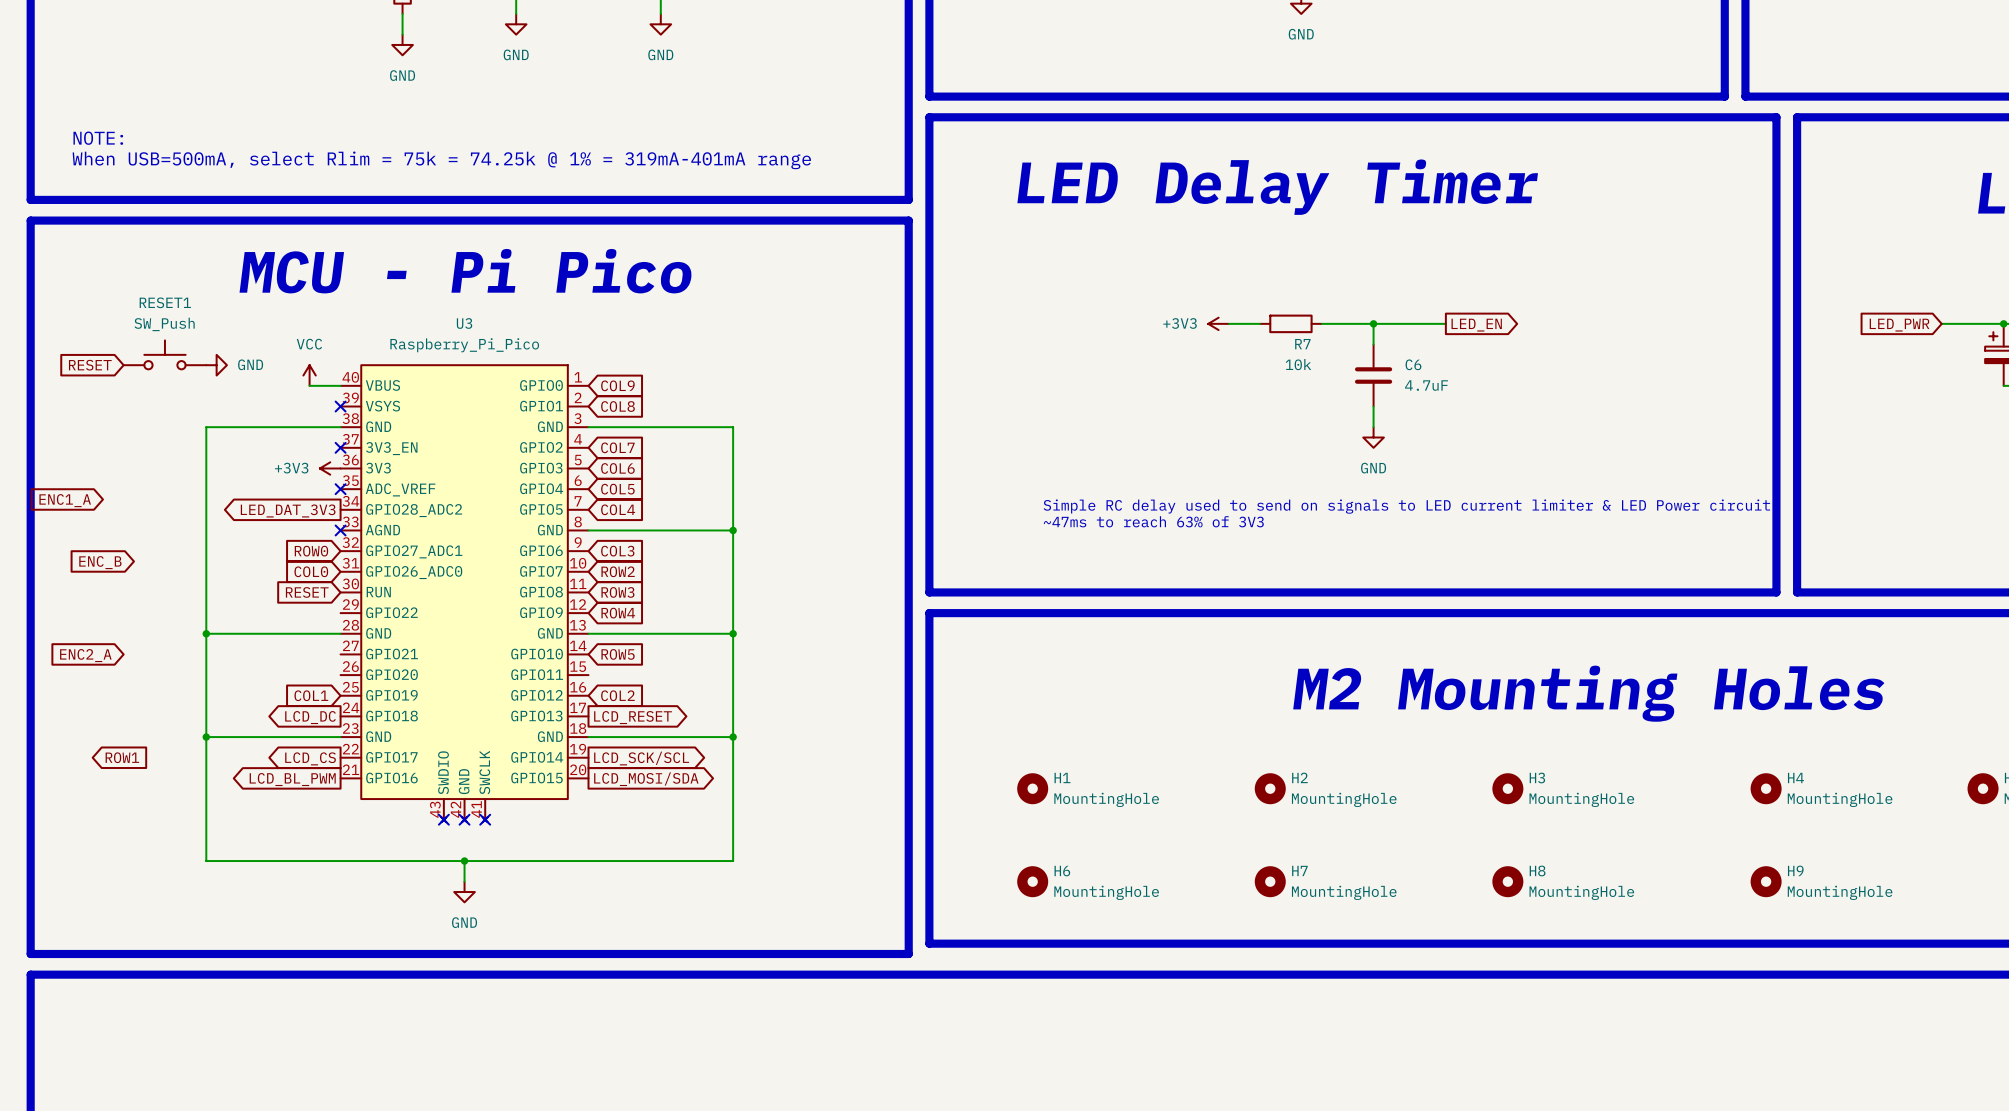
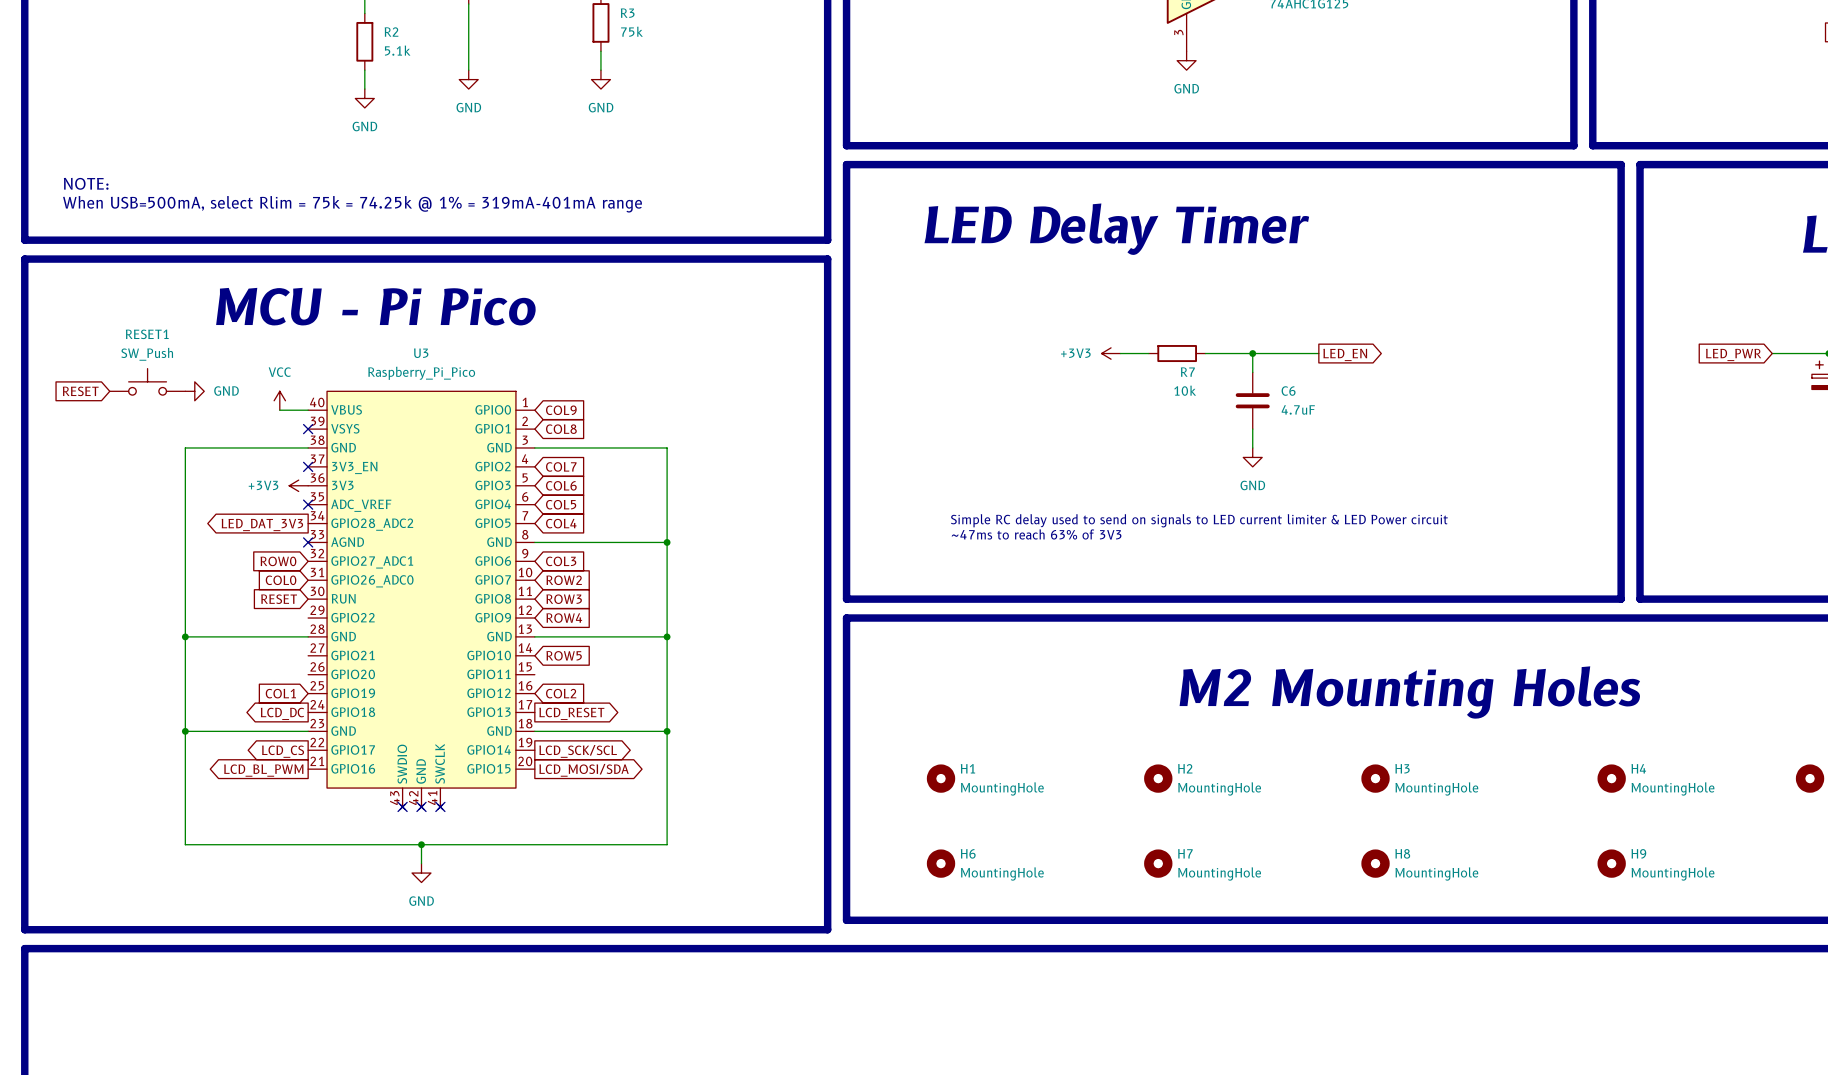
global label: ENC1_A (65, 500) -> none
global label: ENC_B (100, 562) -> none
global label: ENC2_A (85, 655) -> none
global label: ROW1 (122, 757) -> none

